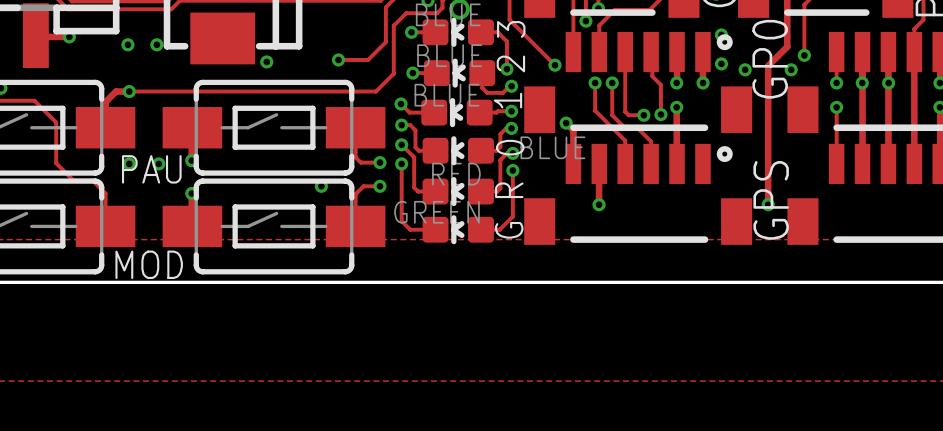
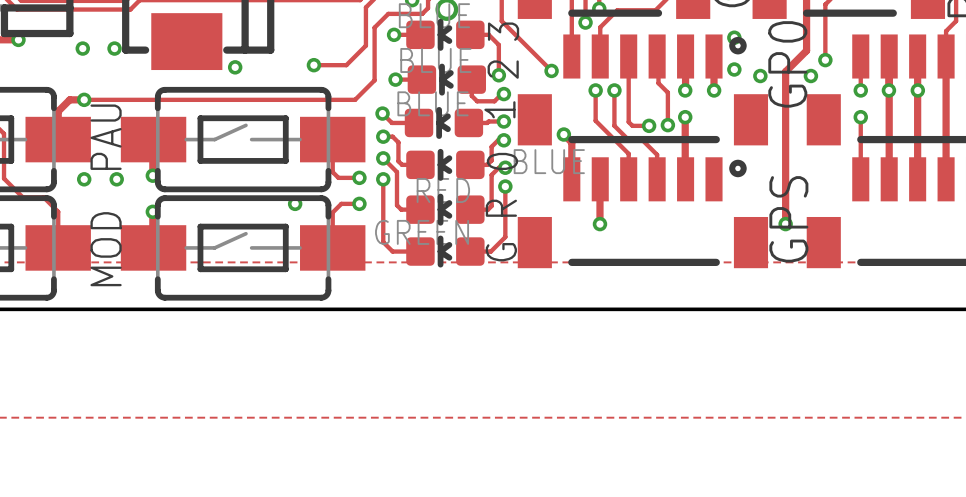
PAU name rotation: 0° (151, 169) -> 90° counterclockwise (106, 137)
MOD name rotation: 0° (149, 264) -> 90° counterclockwise (106, 249)

